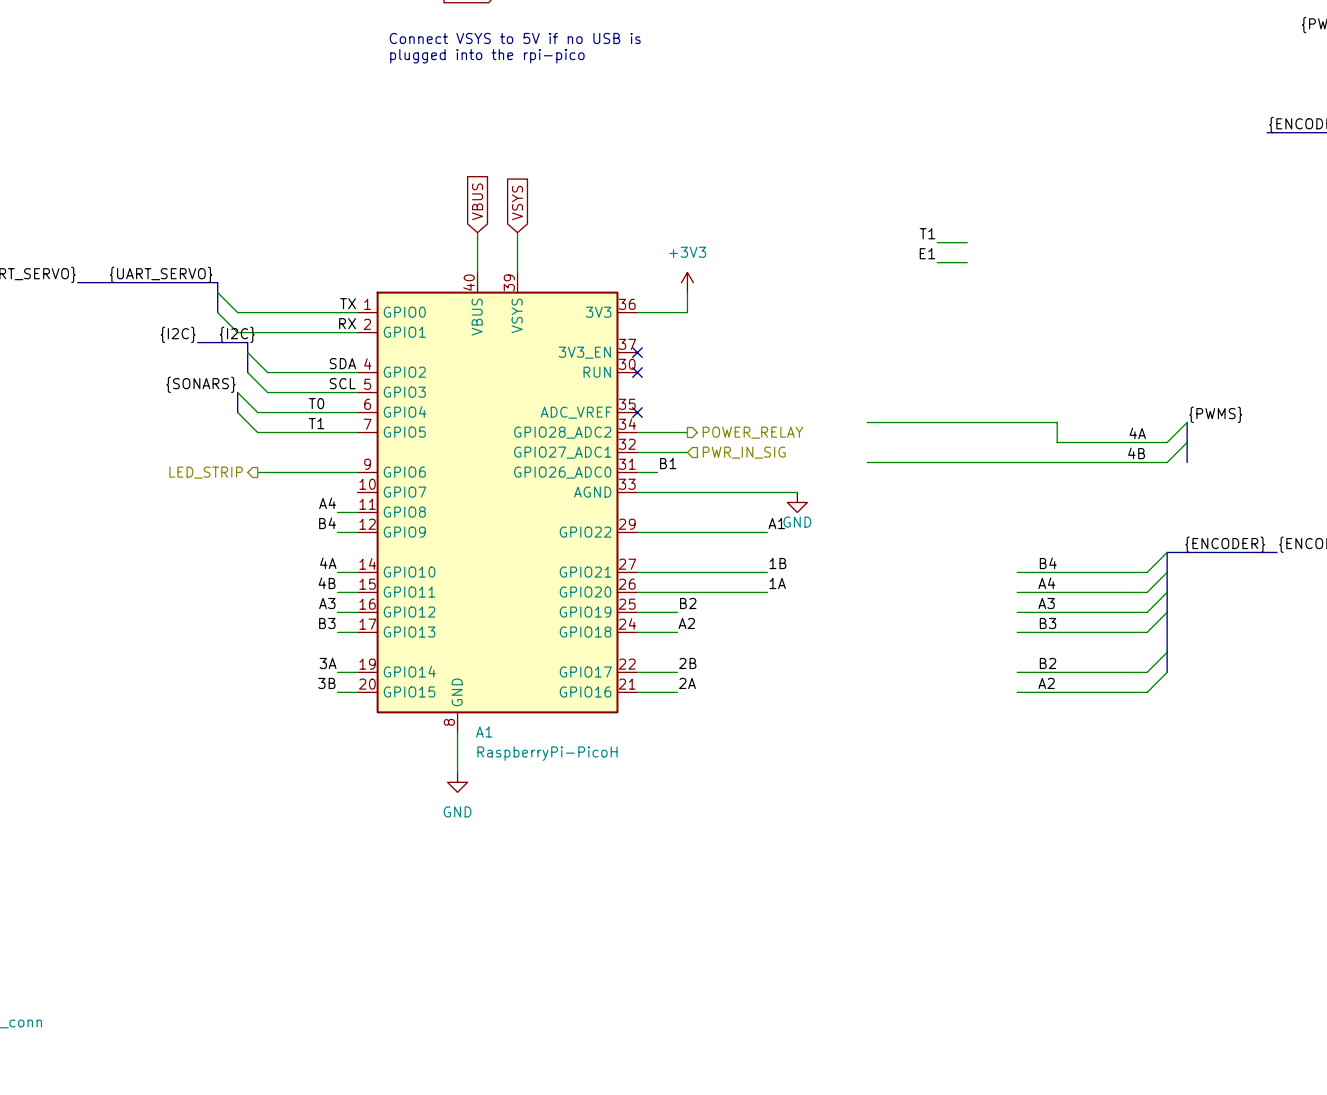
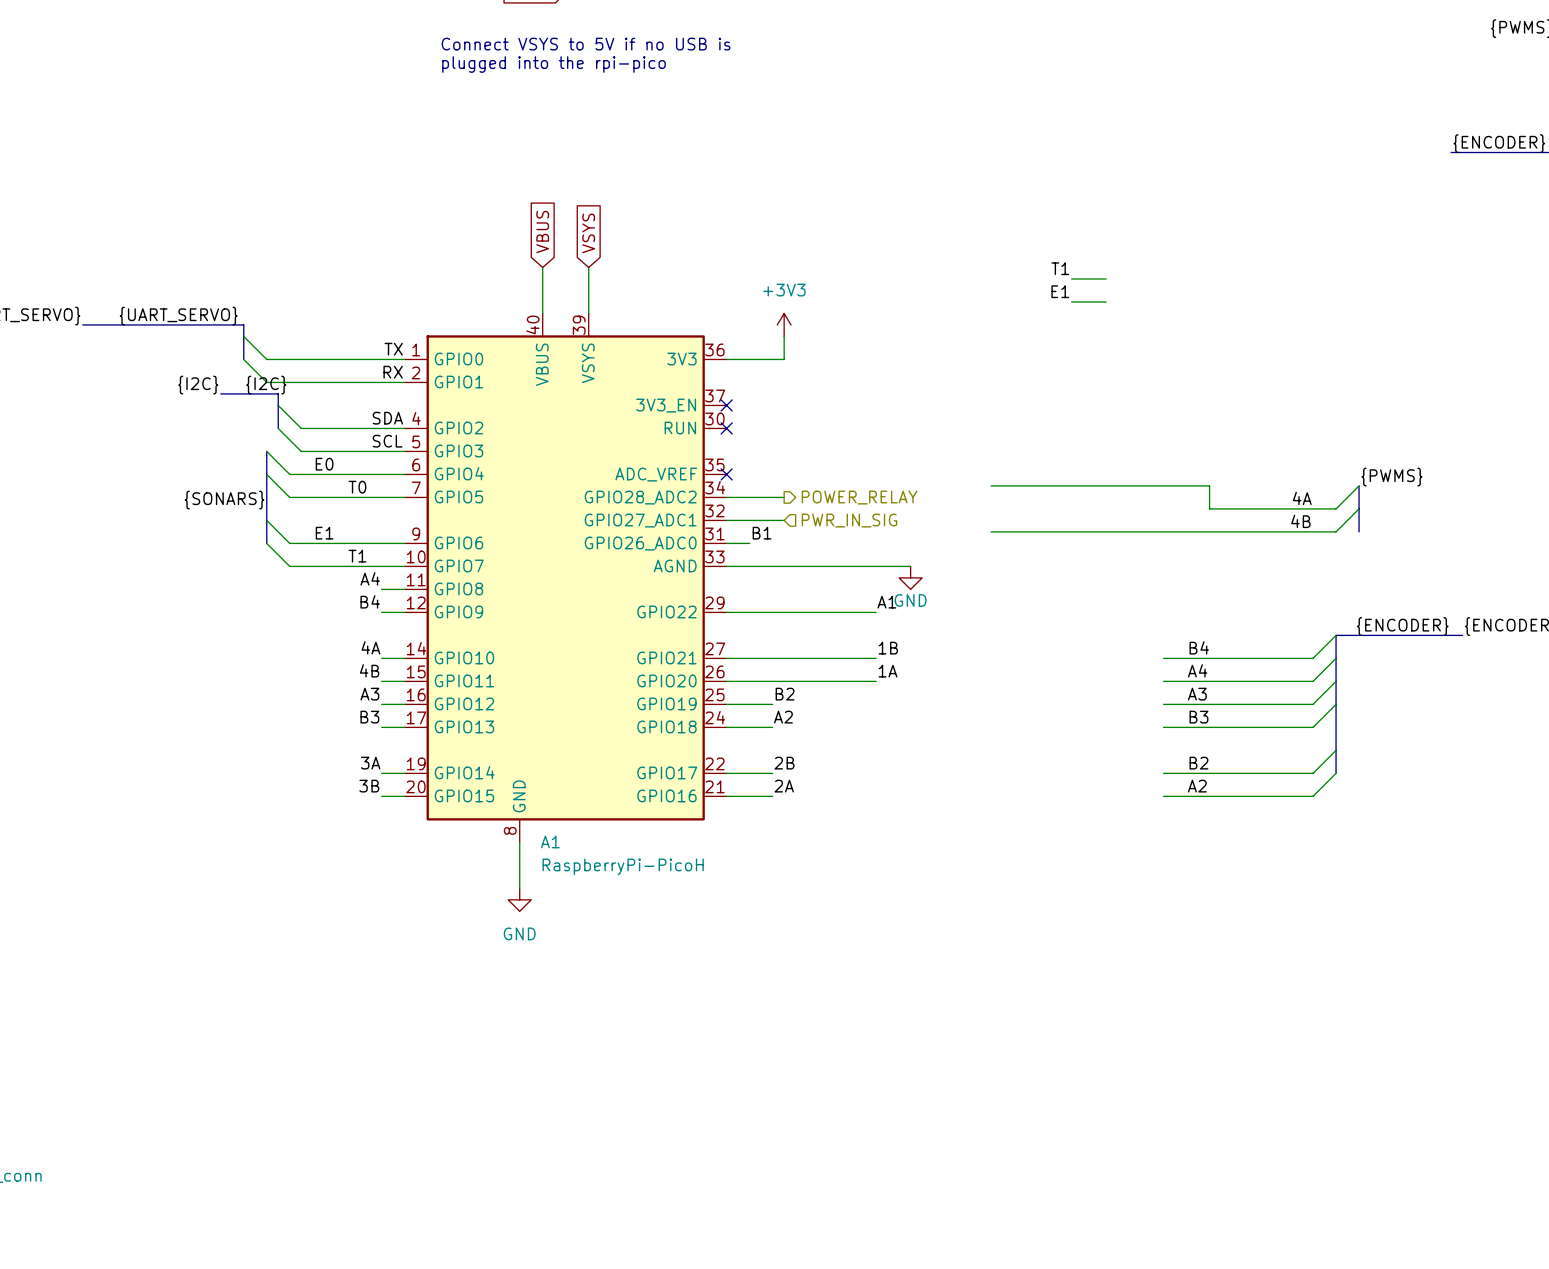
label position: {SONARS} (200, 384) -> {SONARS} (224, 500)
label: none -> E0 (324, 464)
label: T0 (316, 403) -> none
bus: none -> (266, 474) (266, 543)
label: T1 (316, 423) -> T0 (357, 487)
wire: none -> (266, 520) (289, 543)
label: none -> E1 (324, 533)
hierarchical label: LED_STRIP (206, 472) -> none
wire: none -> (266, 543) (289, 566) (404, 566)
label: none -> T1 (357, 556)

